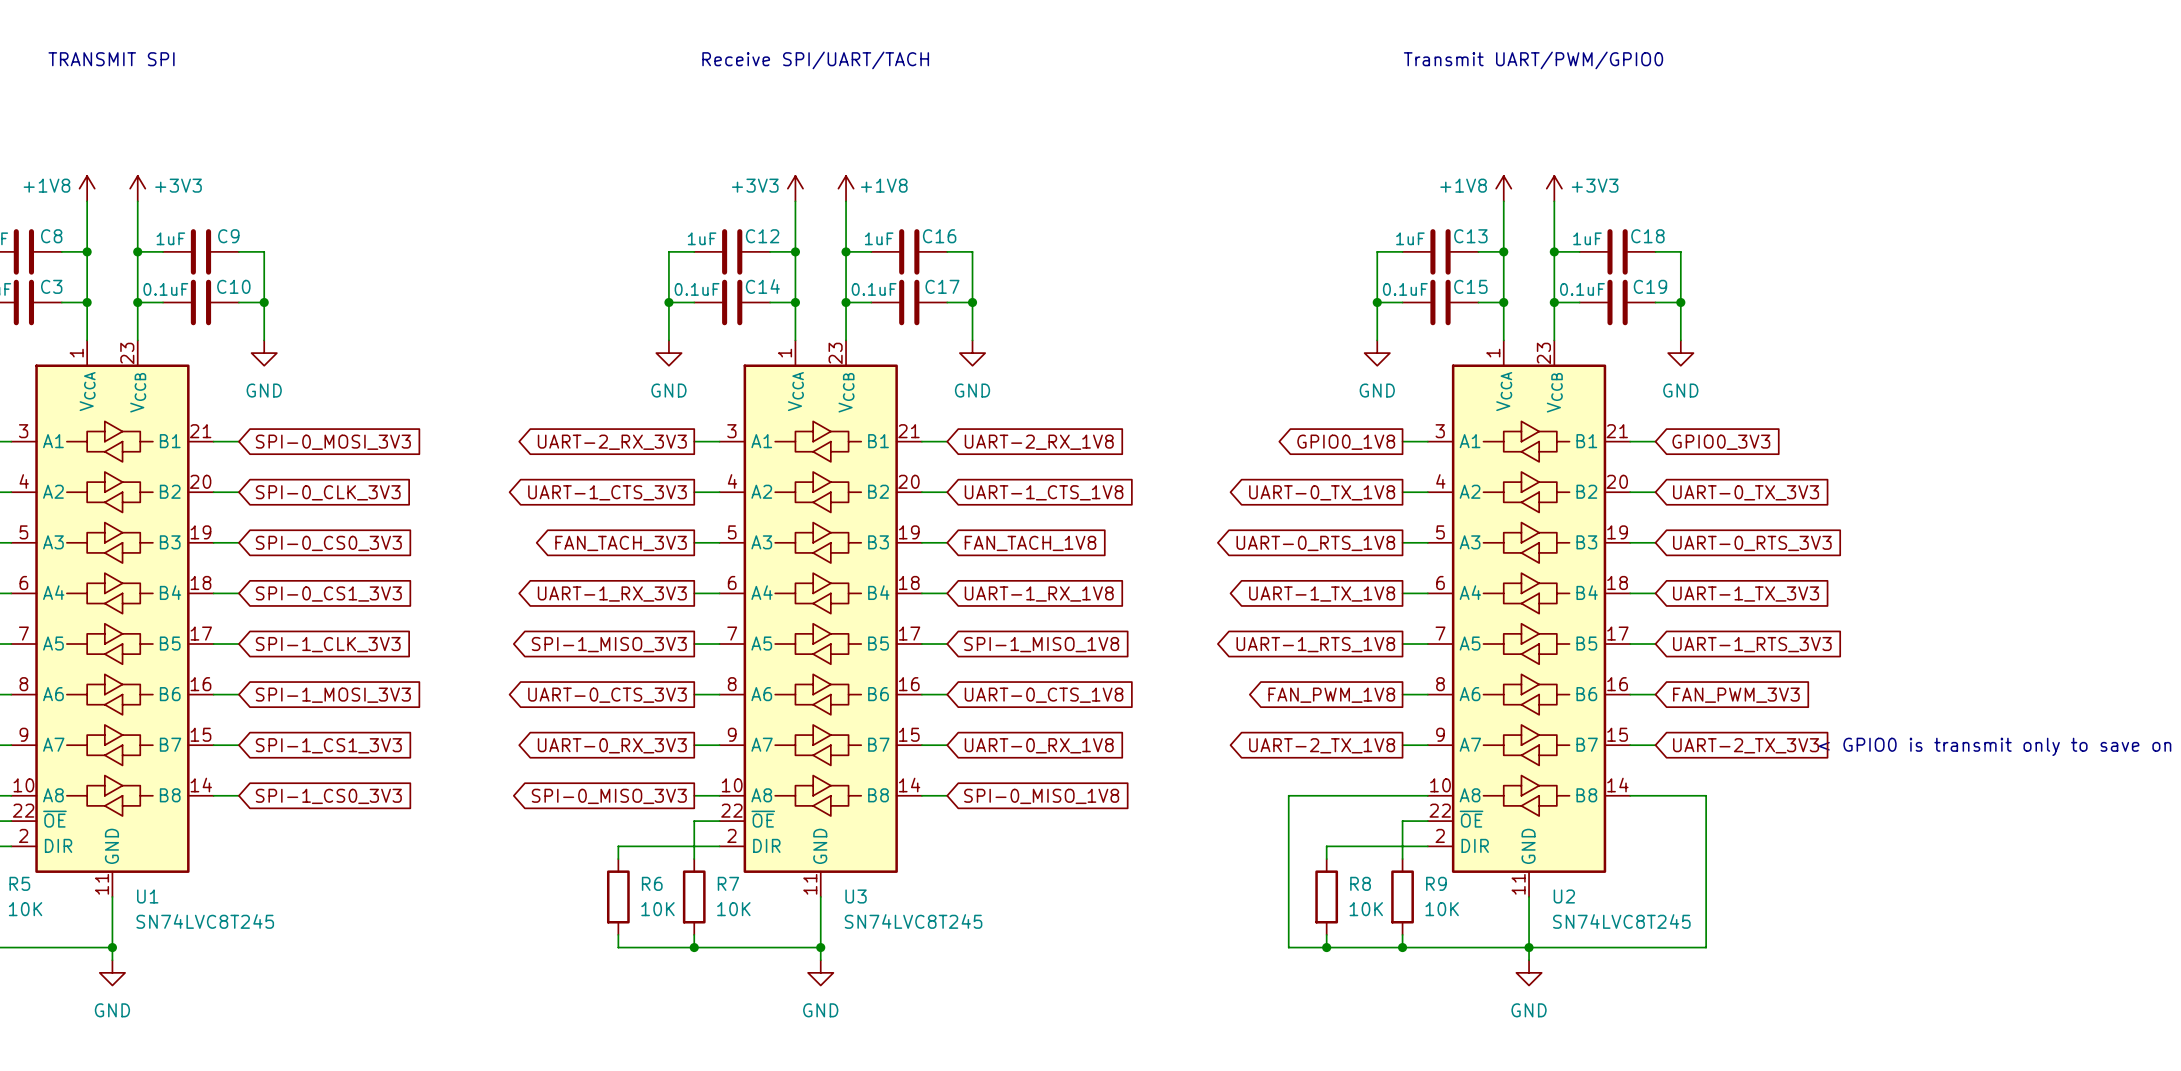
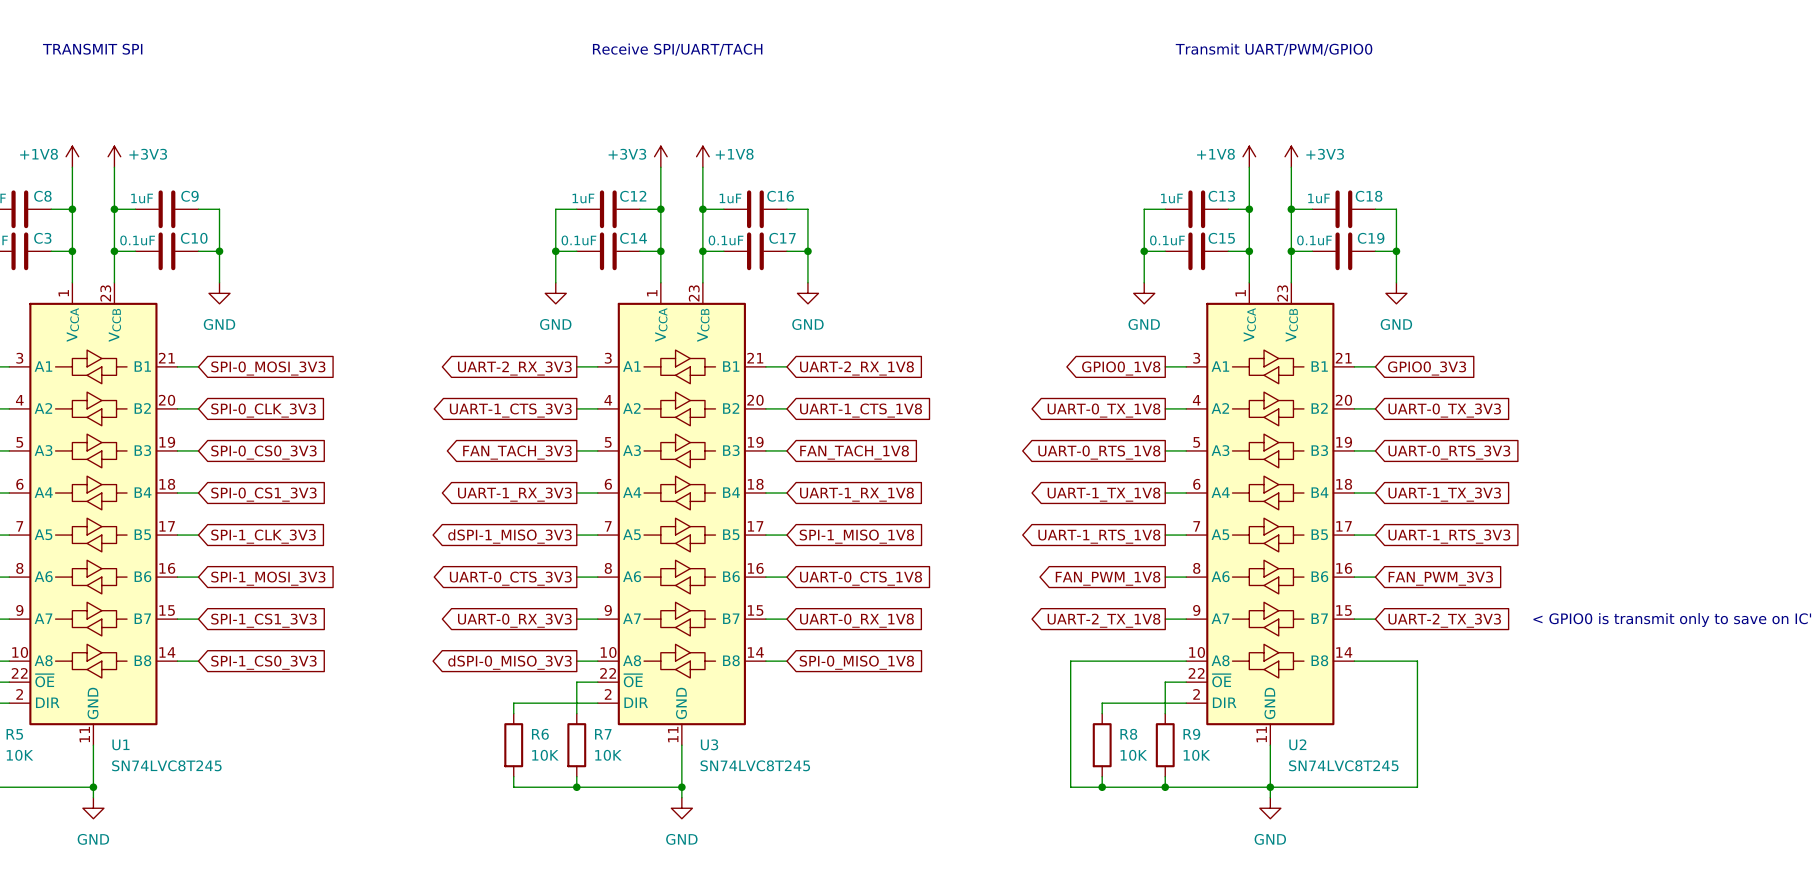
global label: SPI-1_MISO_3V3 (609, 644) -> dSPI-1_MISO_3V3 (509, 536)
global label: SPI-0_MISO_3V3 (609, 796) -> dSPI-0_MISO_3V3 (509, 662)

